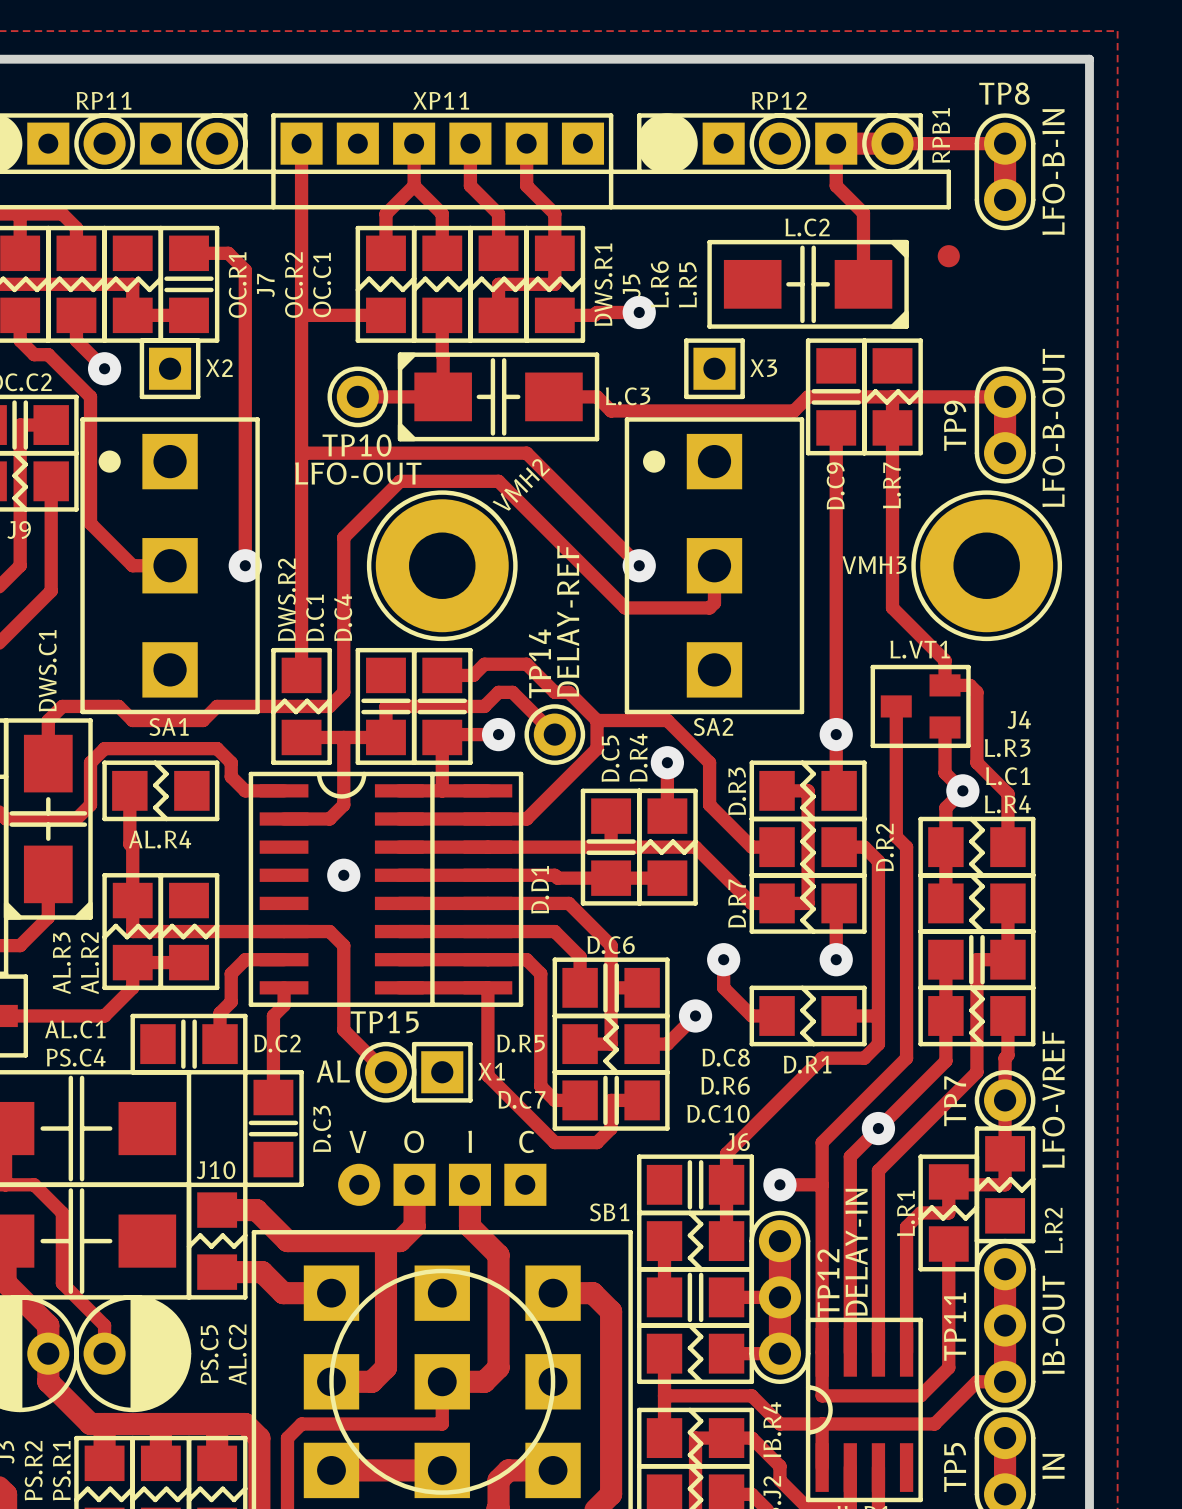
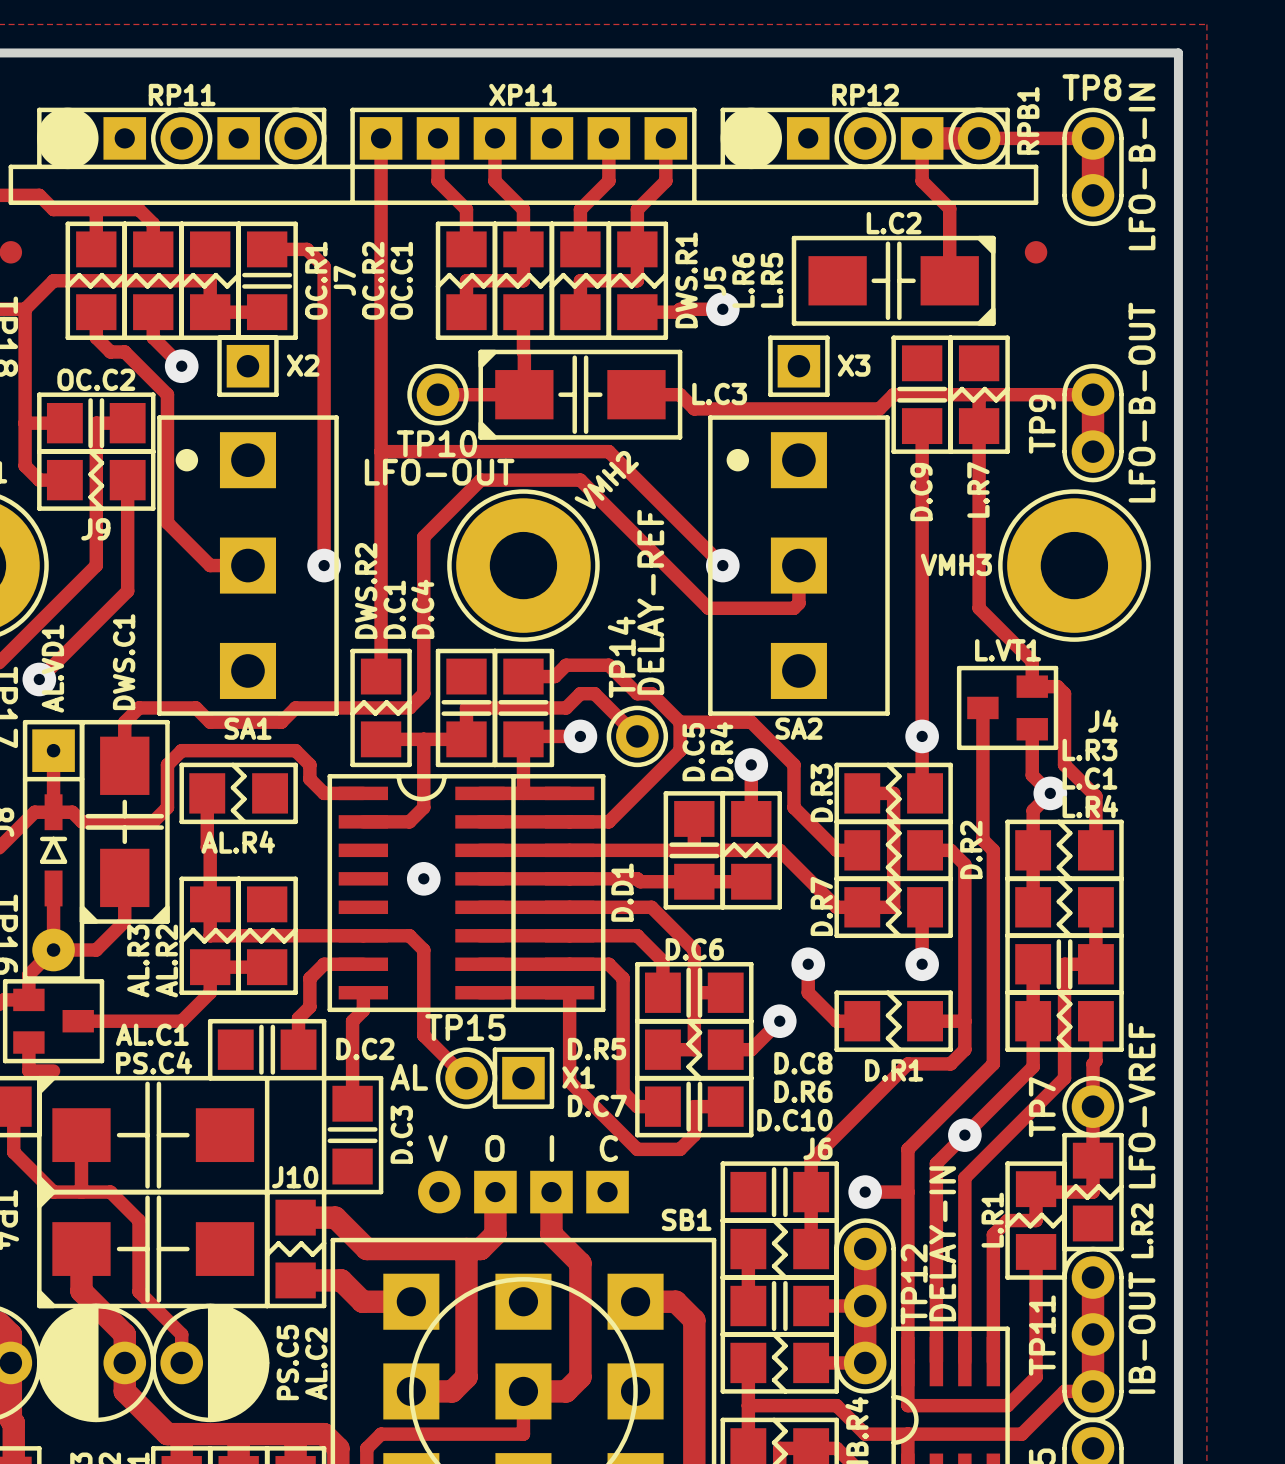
track: (470, 143) (470, 185) (498, 213) -> none
track: none -> (665, 138) (665, 181) (637, 209)
track: (414, 185) (385, 213) -> (438, 138) (438, 181) (466, 209)
track: (526, 185) (554, 213) -> (608, 181) (580, 209)
track: (301, 315) (385, 315) -> (523, 249) (523, 280) (466, 280) (466, 312)

